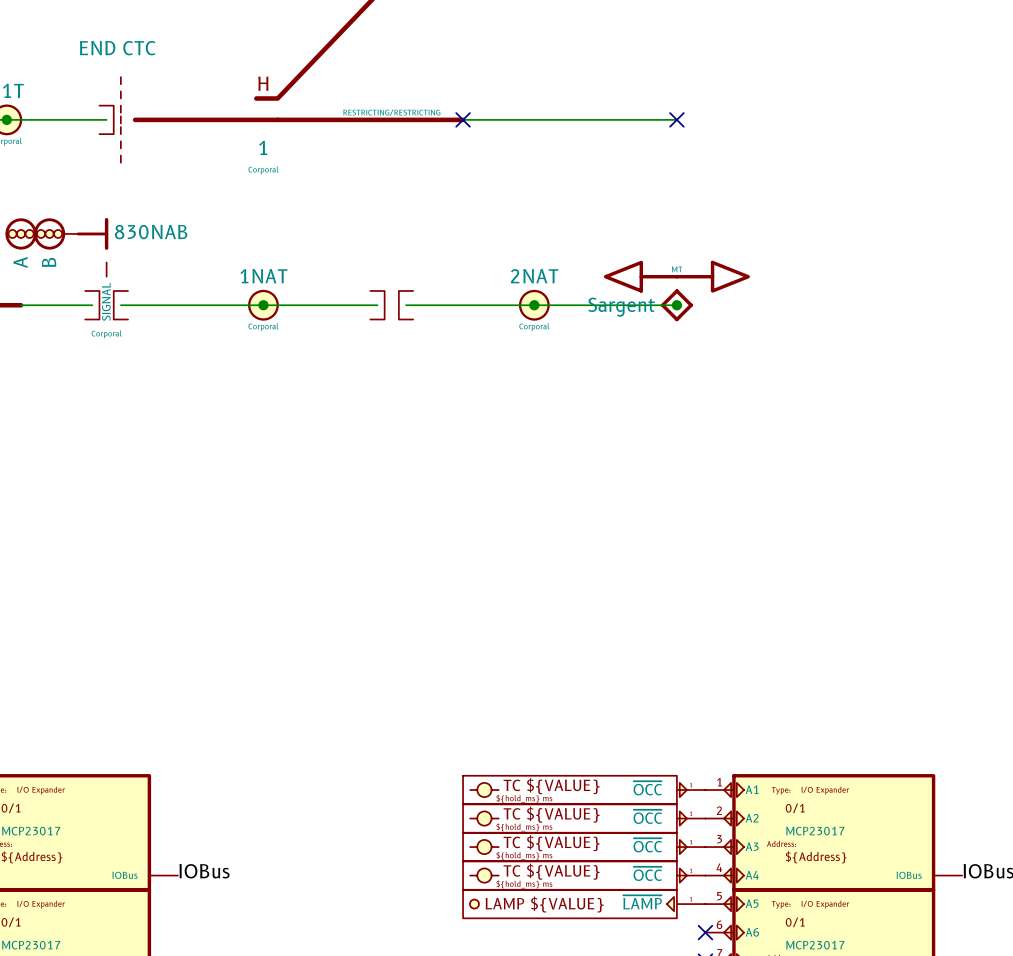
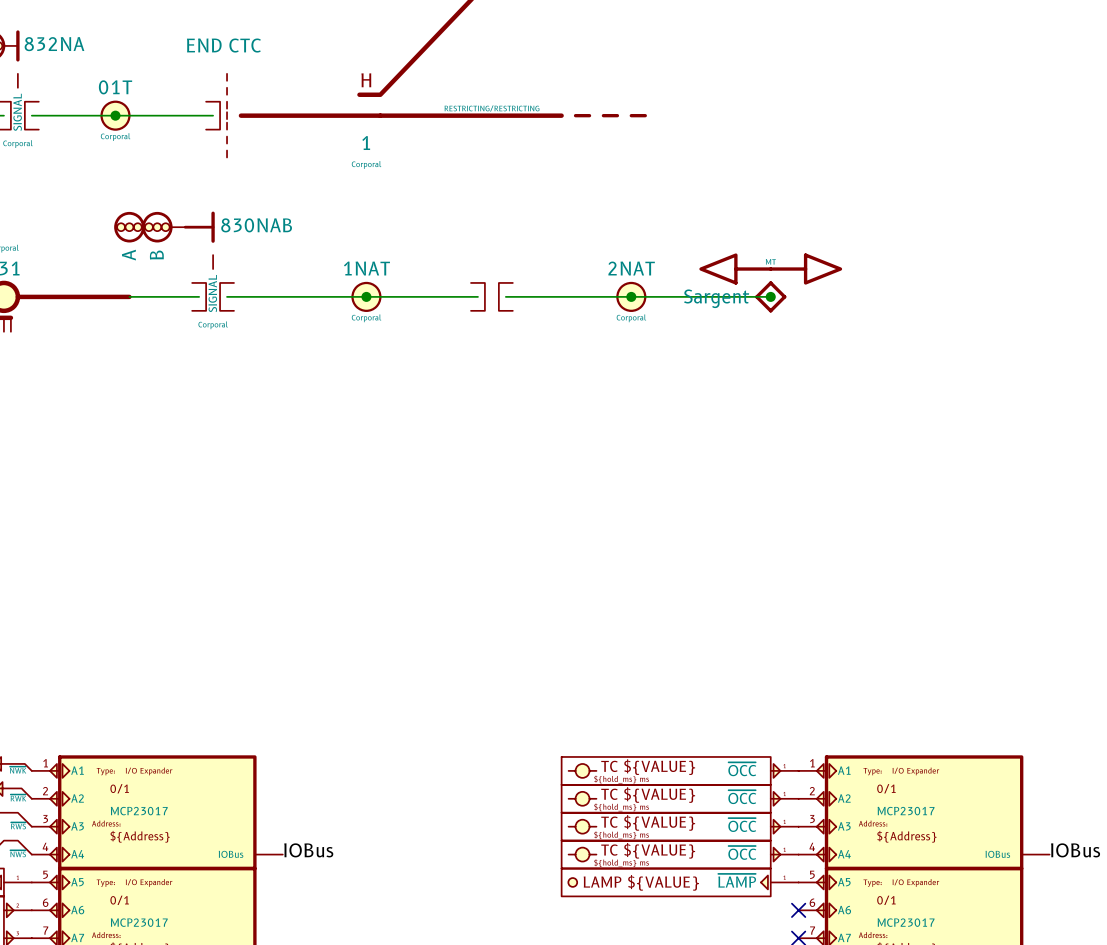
wire: (463, 119) (676, 119) -> none
no-connect mark: (463, 119) -> none
part: none -> (610, 115)
no-connect mark: (676, 119) -> none

